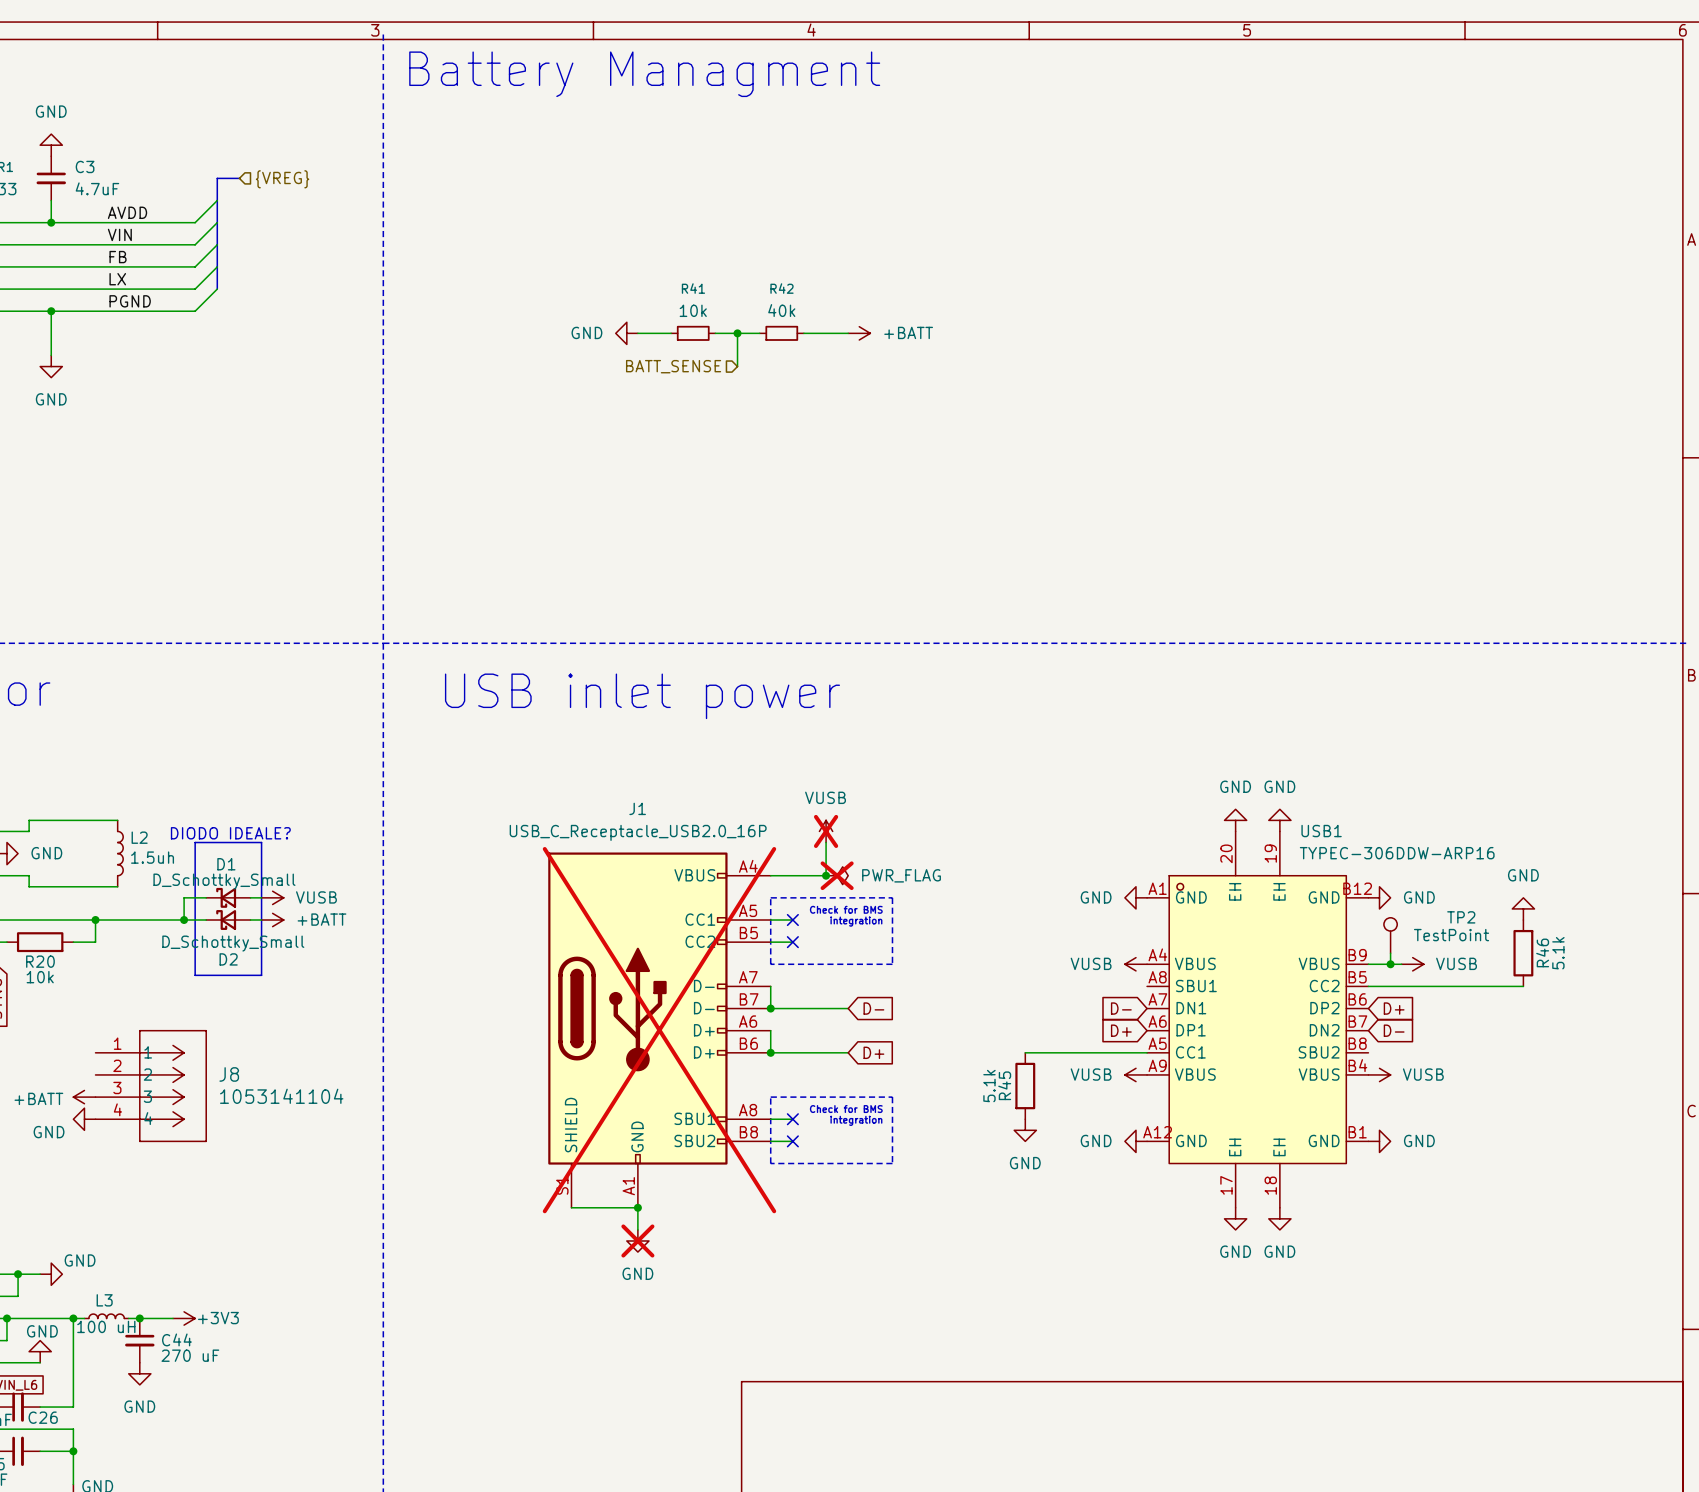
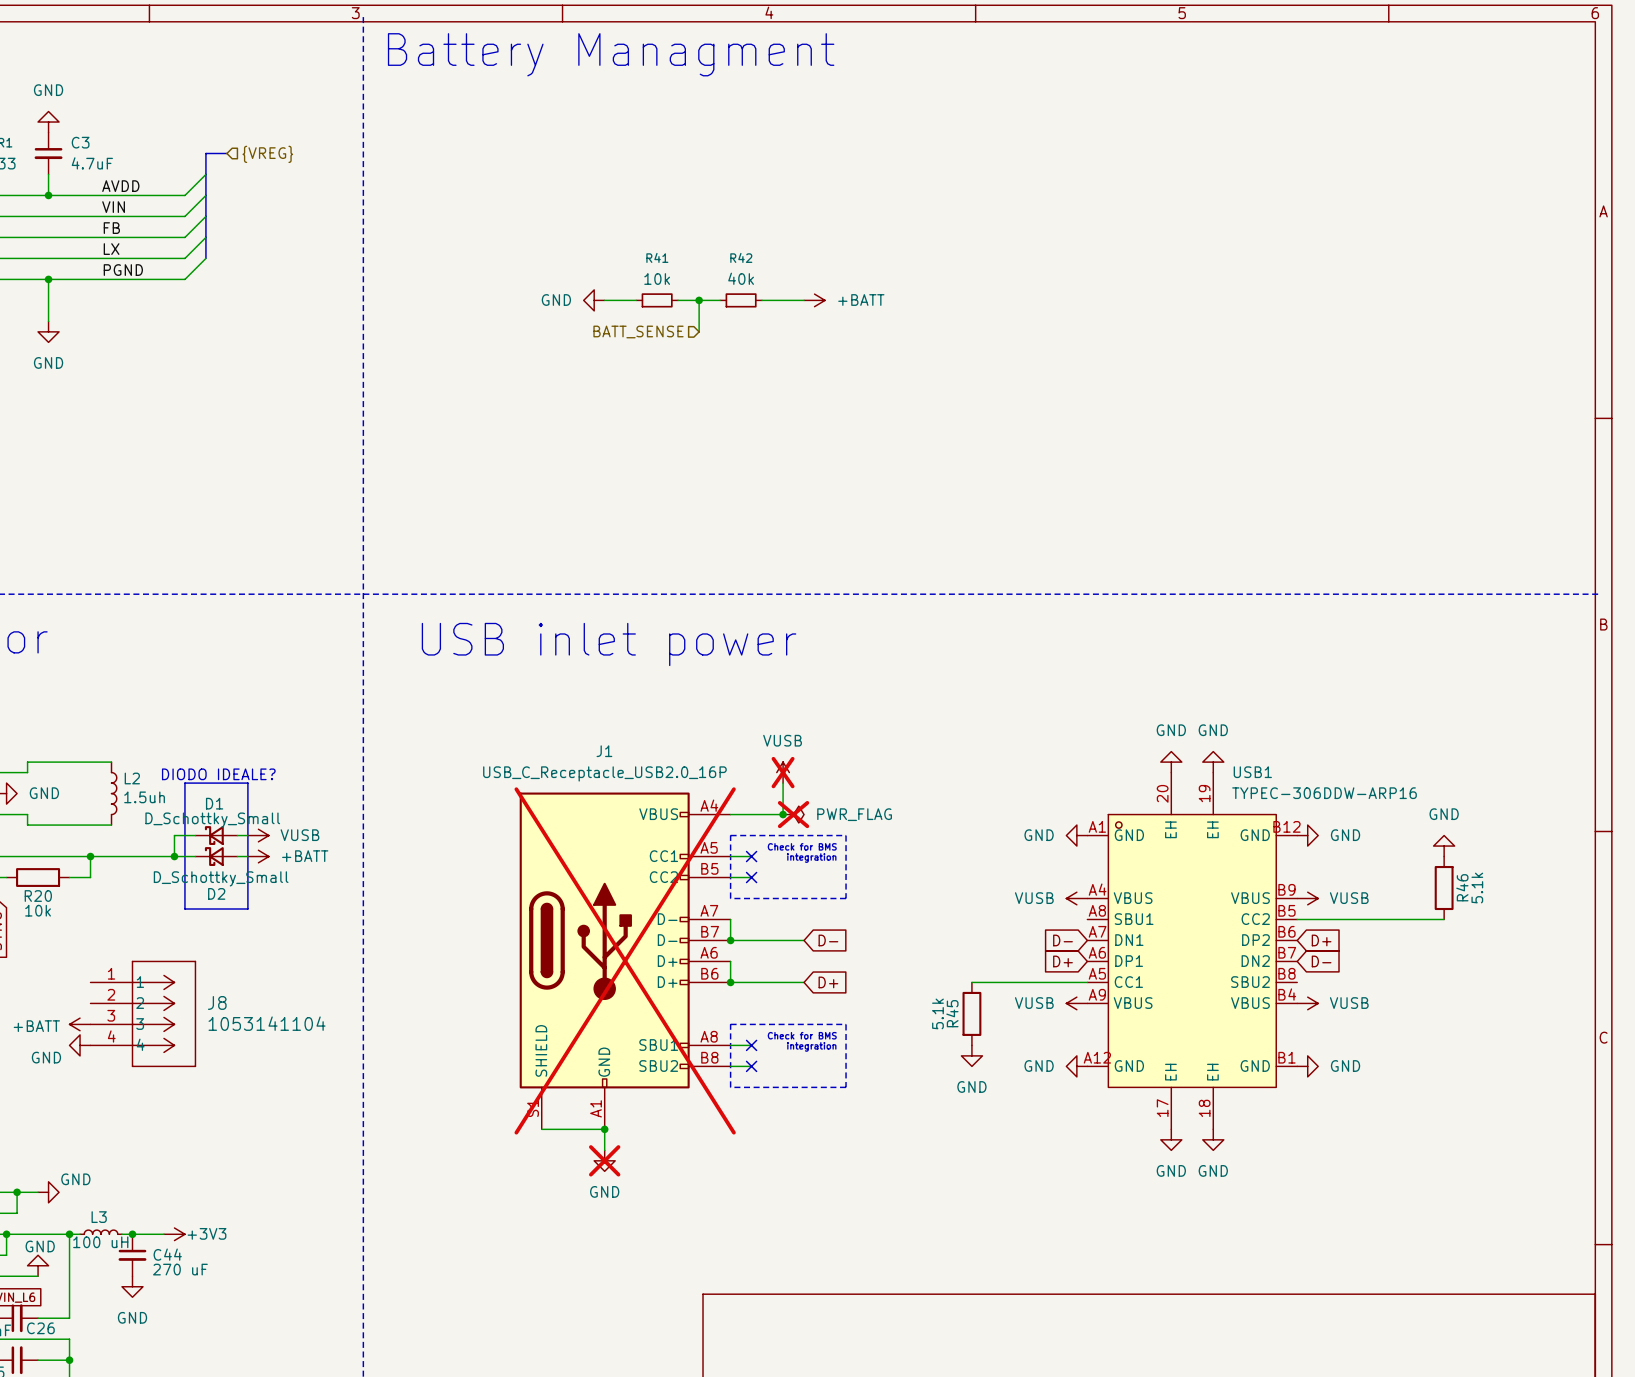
TP2: TestPoint (1390, 935) -> none
wire: (1390, 953) (1390, 964) -> none
junction: (1390, 964) -> none
power symbol position: VUSB (1412, 964) -> VUSB (1307, 898)

